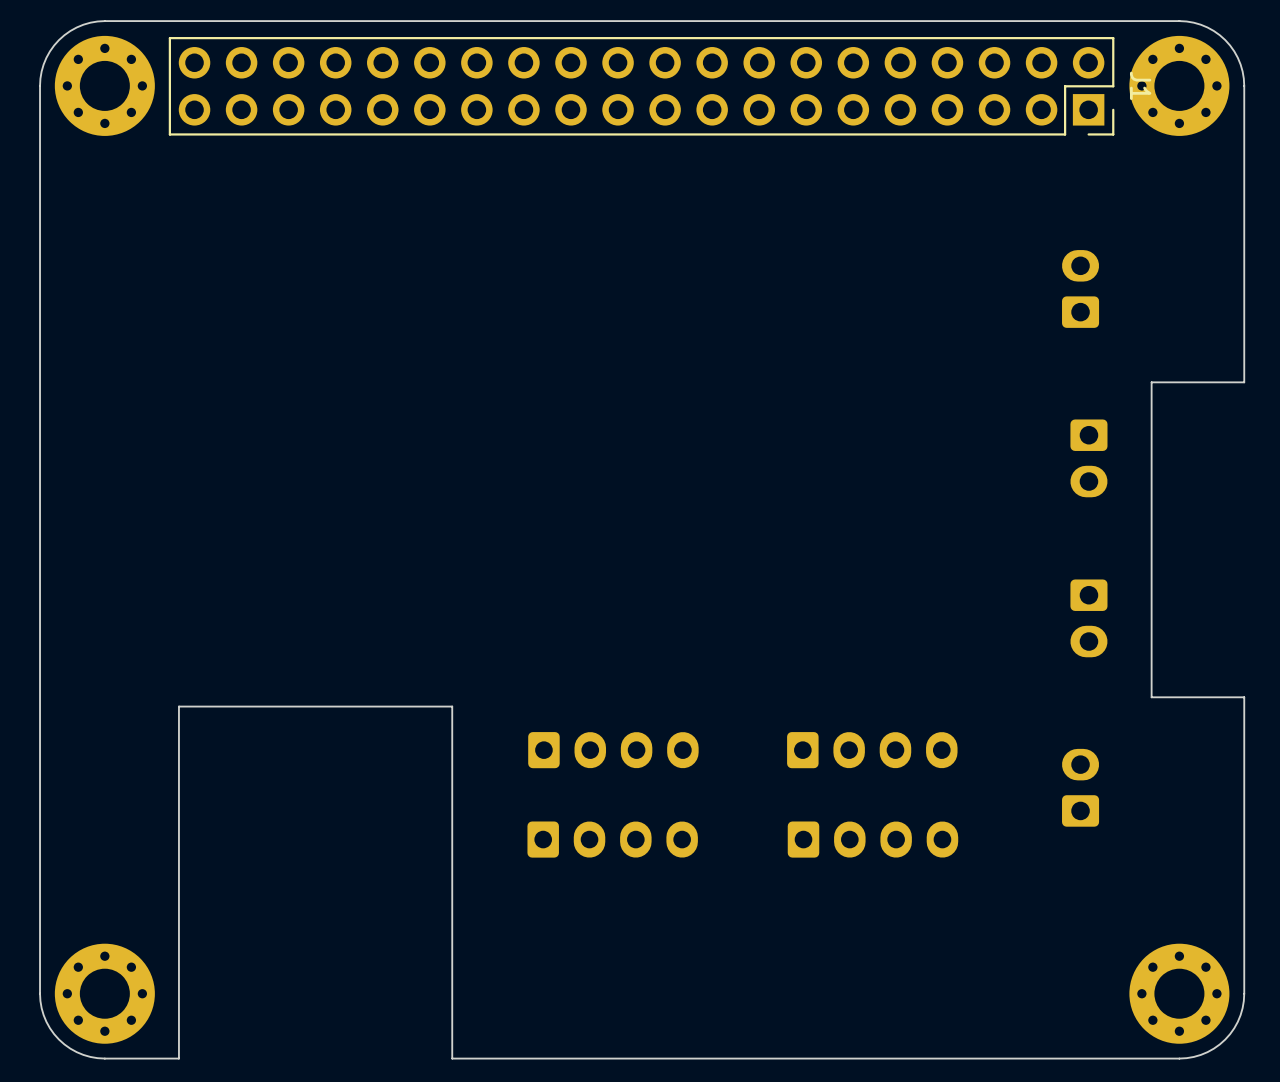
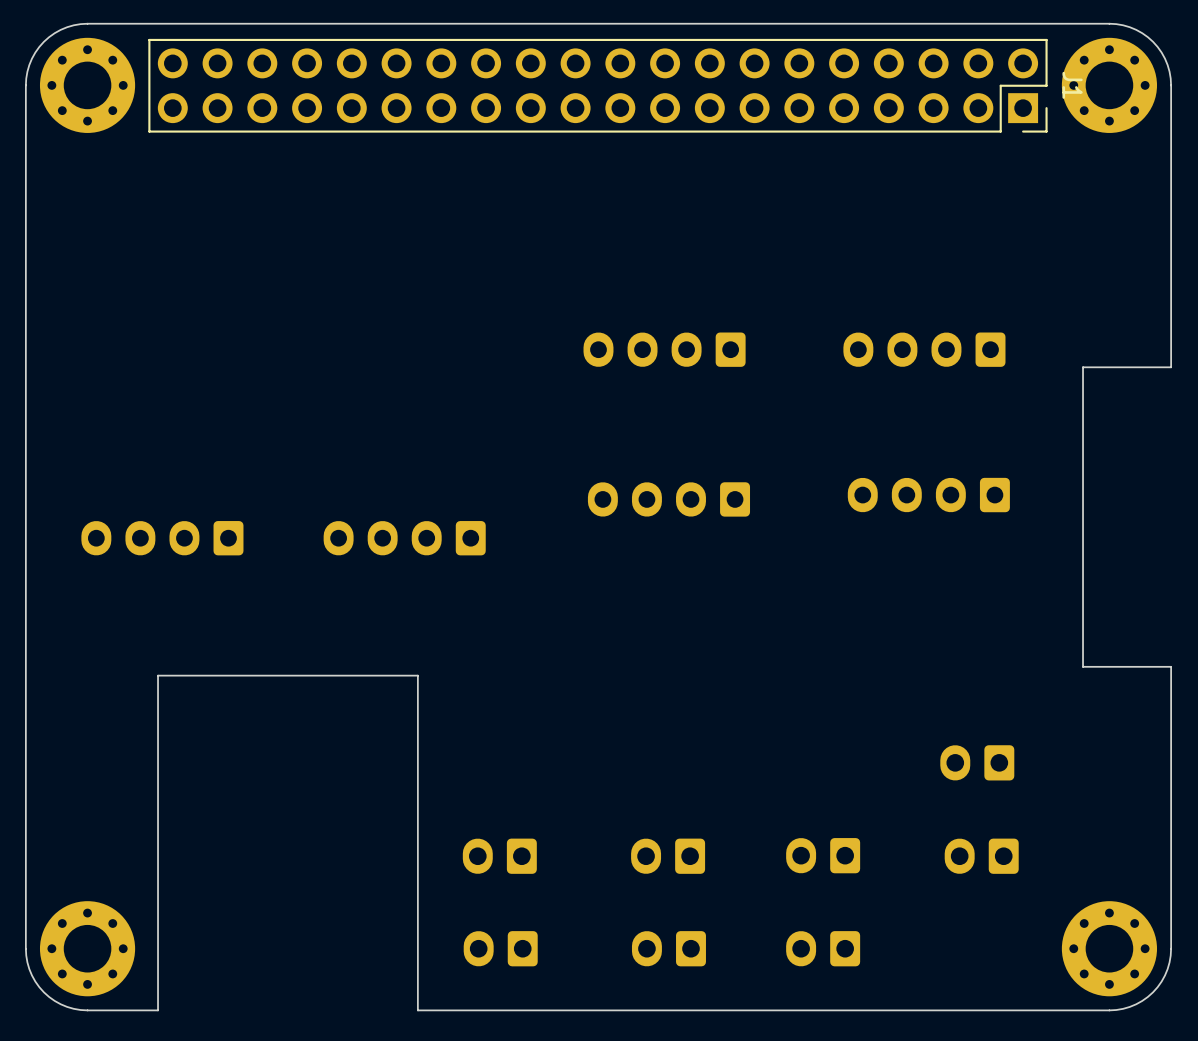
part: (1080, 288) -> none
part: none -> (664, 349)
part: none -> (924, 349)
part: (1088, 458) -> none
part: none -> (928, 495)
part: none -> (668, 499)
part: none -> (162, 538)
part: none -> (404, 538)
part: (1088, 618) -> none
part: (613, 750) -> none
part: (872, 750) -> none
part rotation: 0° (1080, 787) -> 90° counterclockwise (977, 762)
part: (612, 839) -> none
part: (872, 839) -> none
part: none -> (823, 855)
part: none -> (499, 856)
part: none -> (668, 856)
part: none -> (981, 856)
part: none -> (500, 948)
part: none -> (668, 948)
part: none -> (823, 948)

